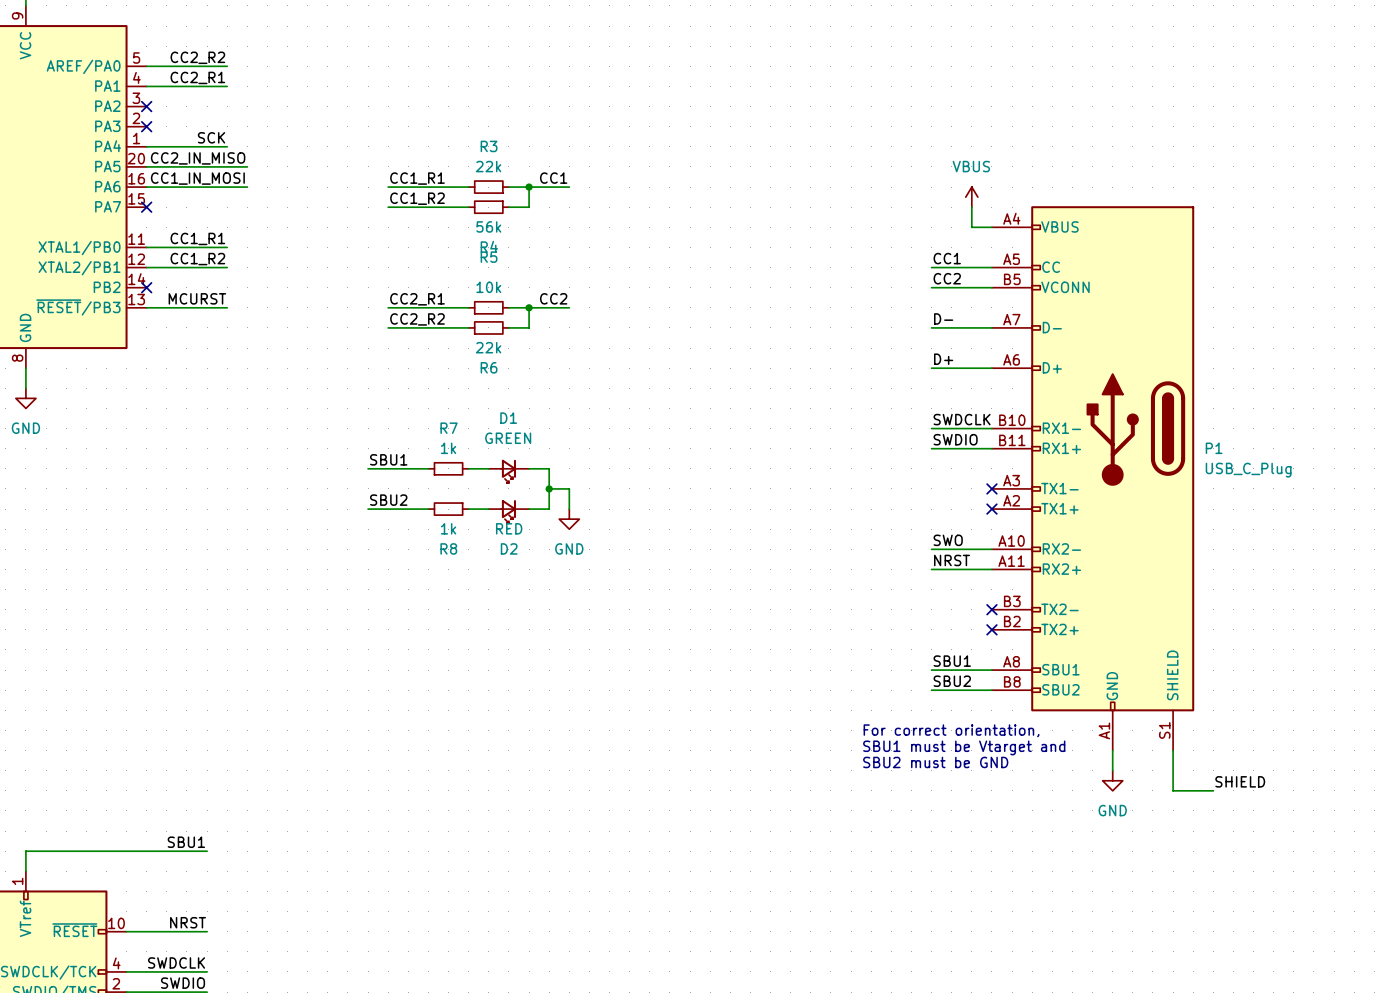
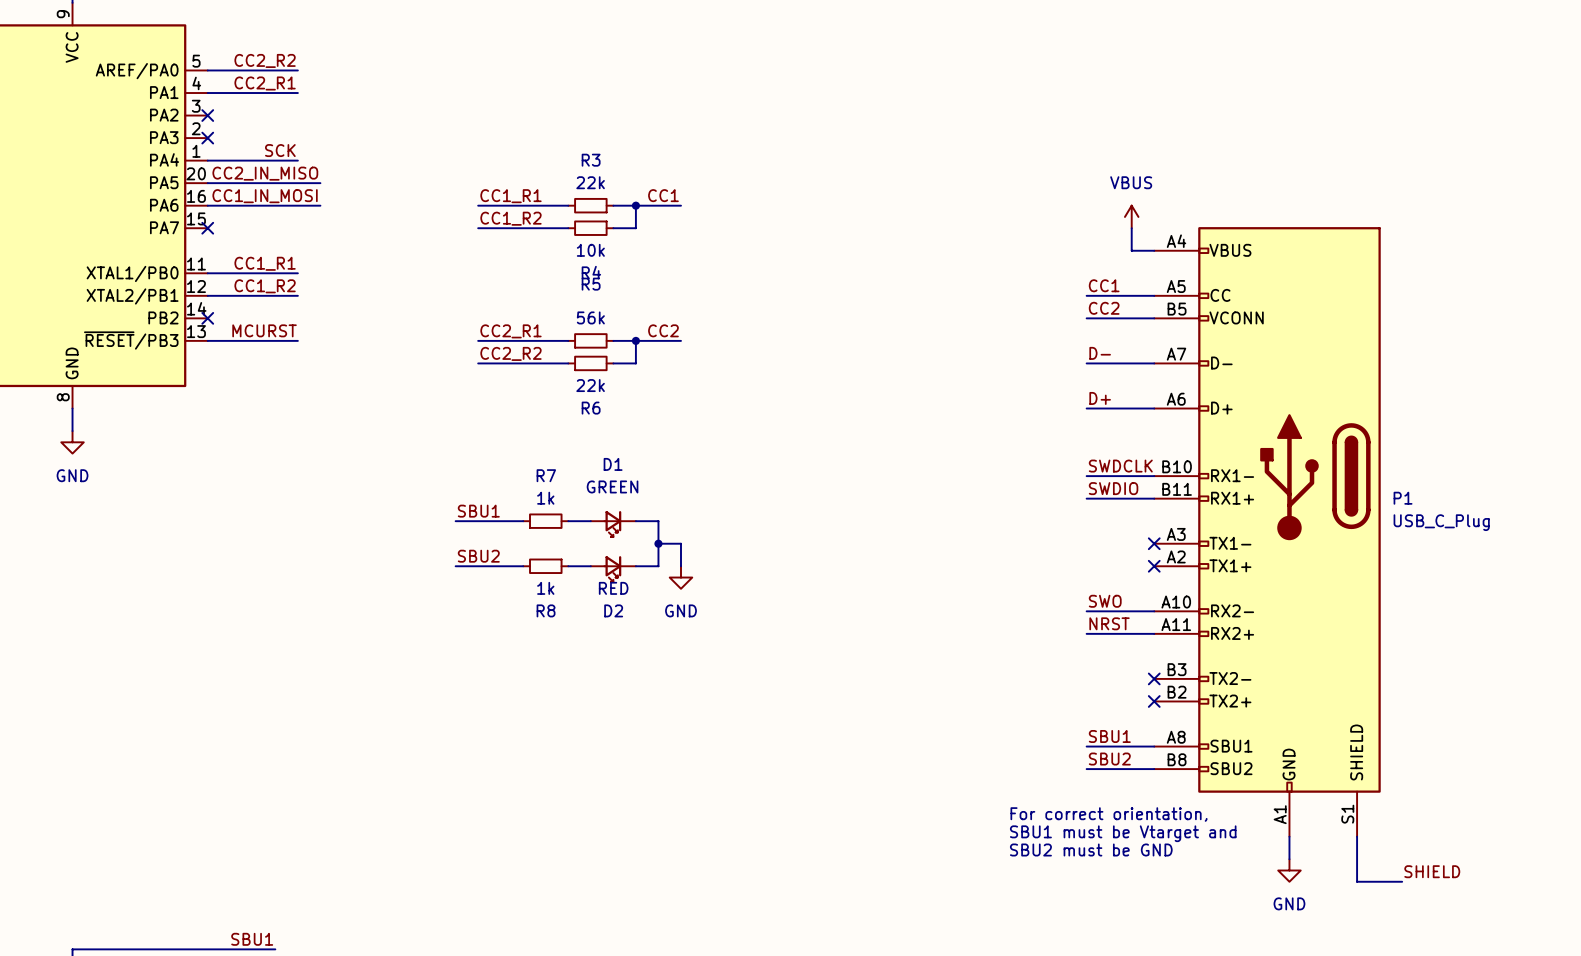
R4 value: 56k (488, 226) -> 10k (590, 250)
R5 value: 10k (488, 287) -> 56k (590, 317)

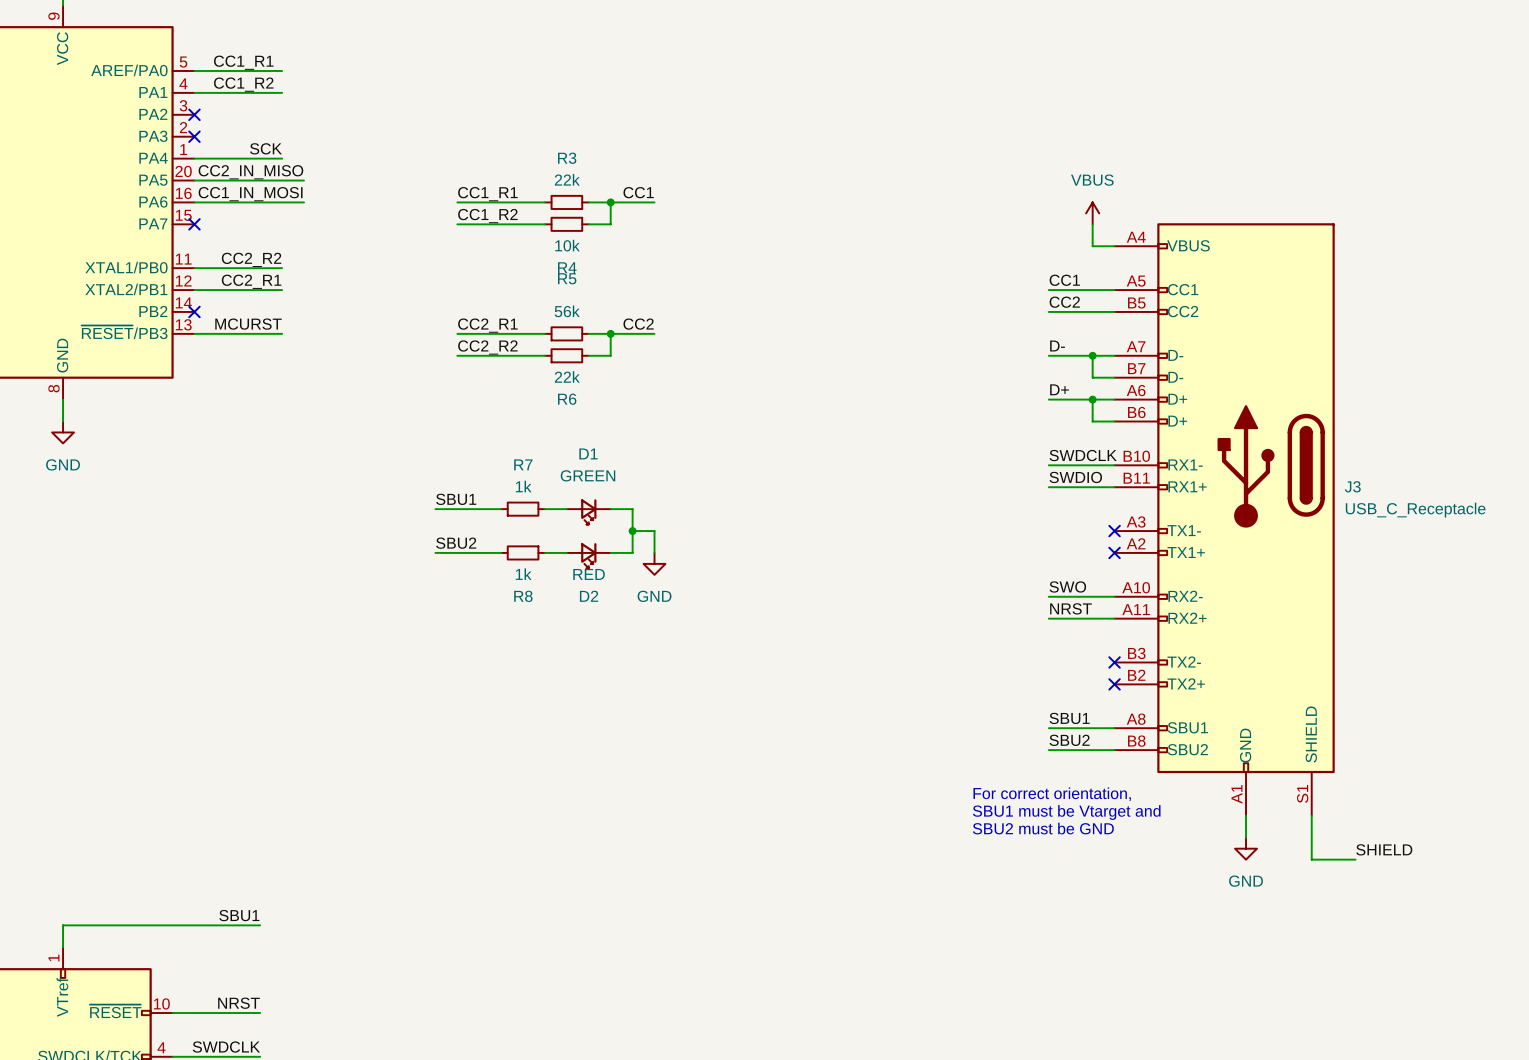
label: CC2_R2 (265, 60) -> CC1_R1 (243, 62)
label: CC2_R1 (265, 83) -> CC1_R2 (243, 84)
label: CC1_R1 (265, 263) -> CC2_R2 (251, 259)
label: CC1_R2 (265, 286) -> CC2_R1 (251, 281)
wire: none -> (1092, 355) (1092, 377) (1114, 377)
junction: none -> (1092, 355)
wire: none -> (1092, 399) (1092, 421) (1114, 421)
junction: none -> (1092, 399)
P1: USB_C_Plug (1267, 531) -> none
J3: none -> USB_C_Receptacle (1224, 519)

